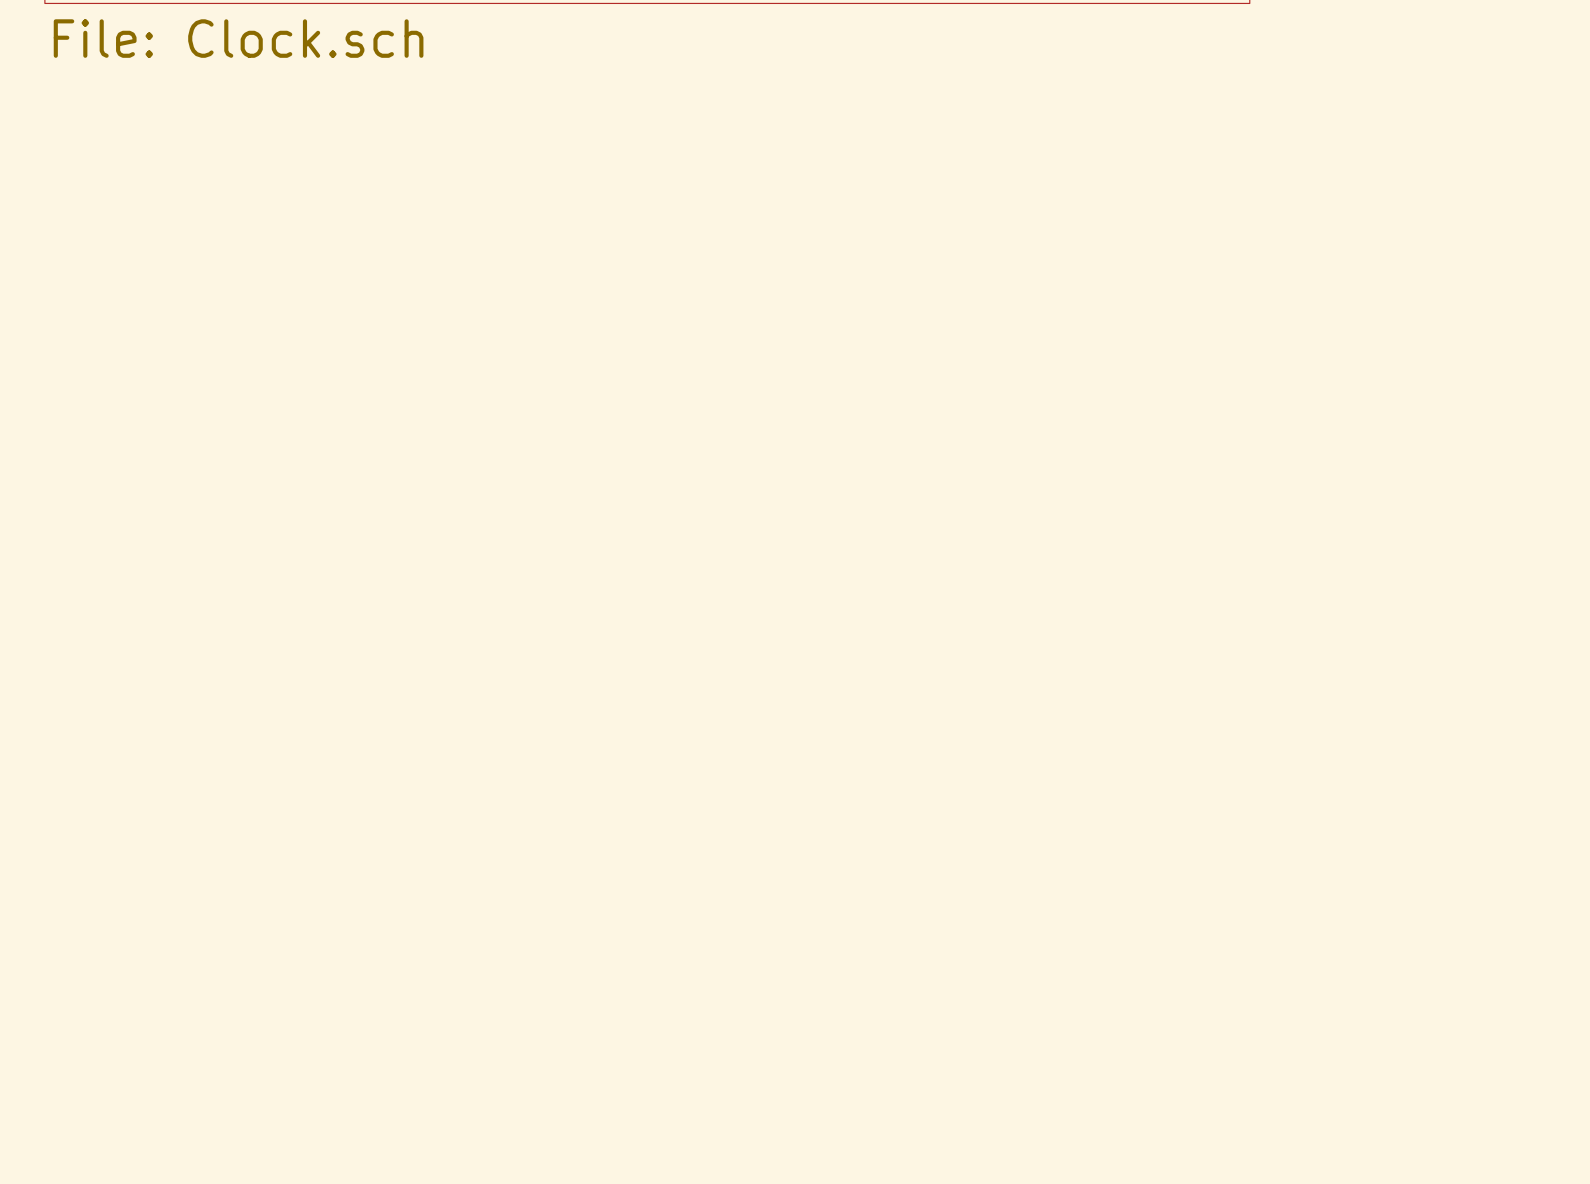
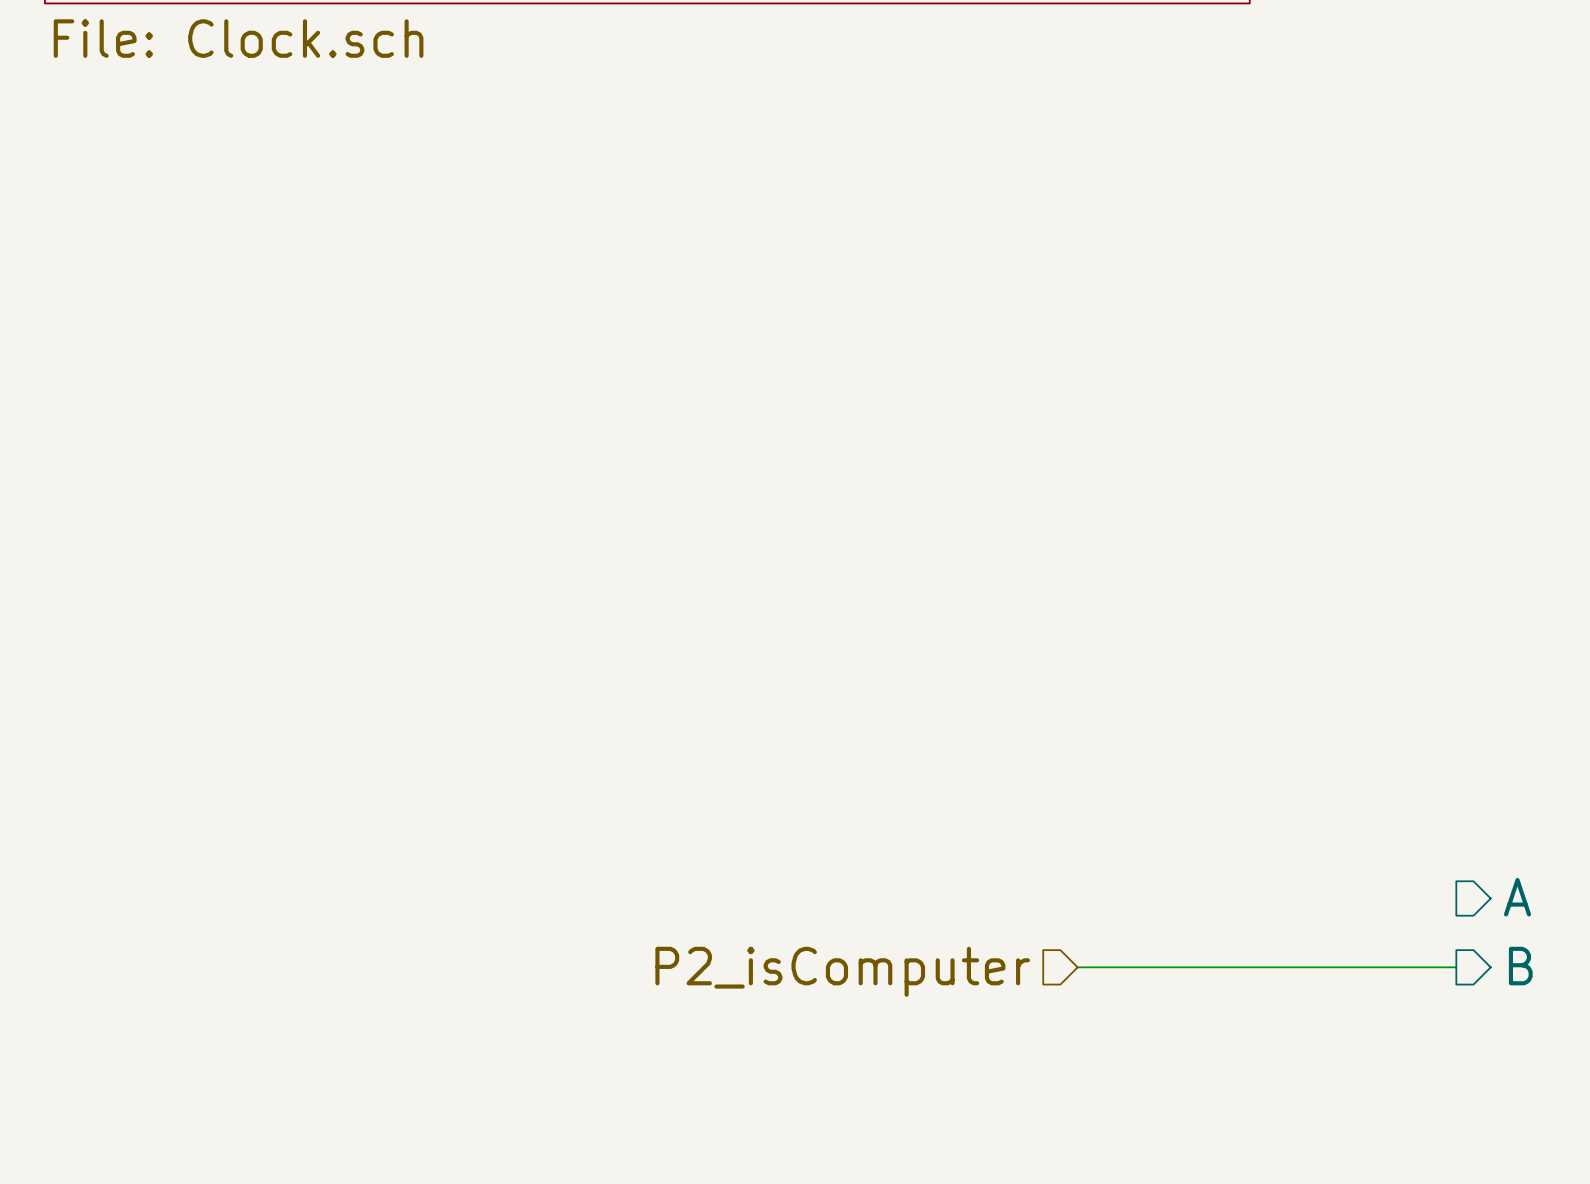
sheet pin: none -> A (1517, 897)
sheet pin: none -> B (1520, 966)
wire: none -> (1077, 967) (1456, 967)
hierarchical label: none -> P2_isComputer (842, 971)

